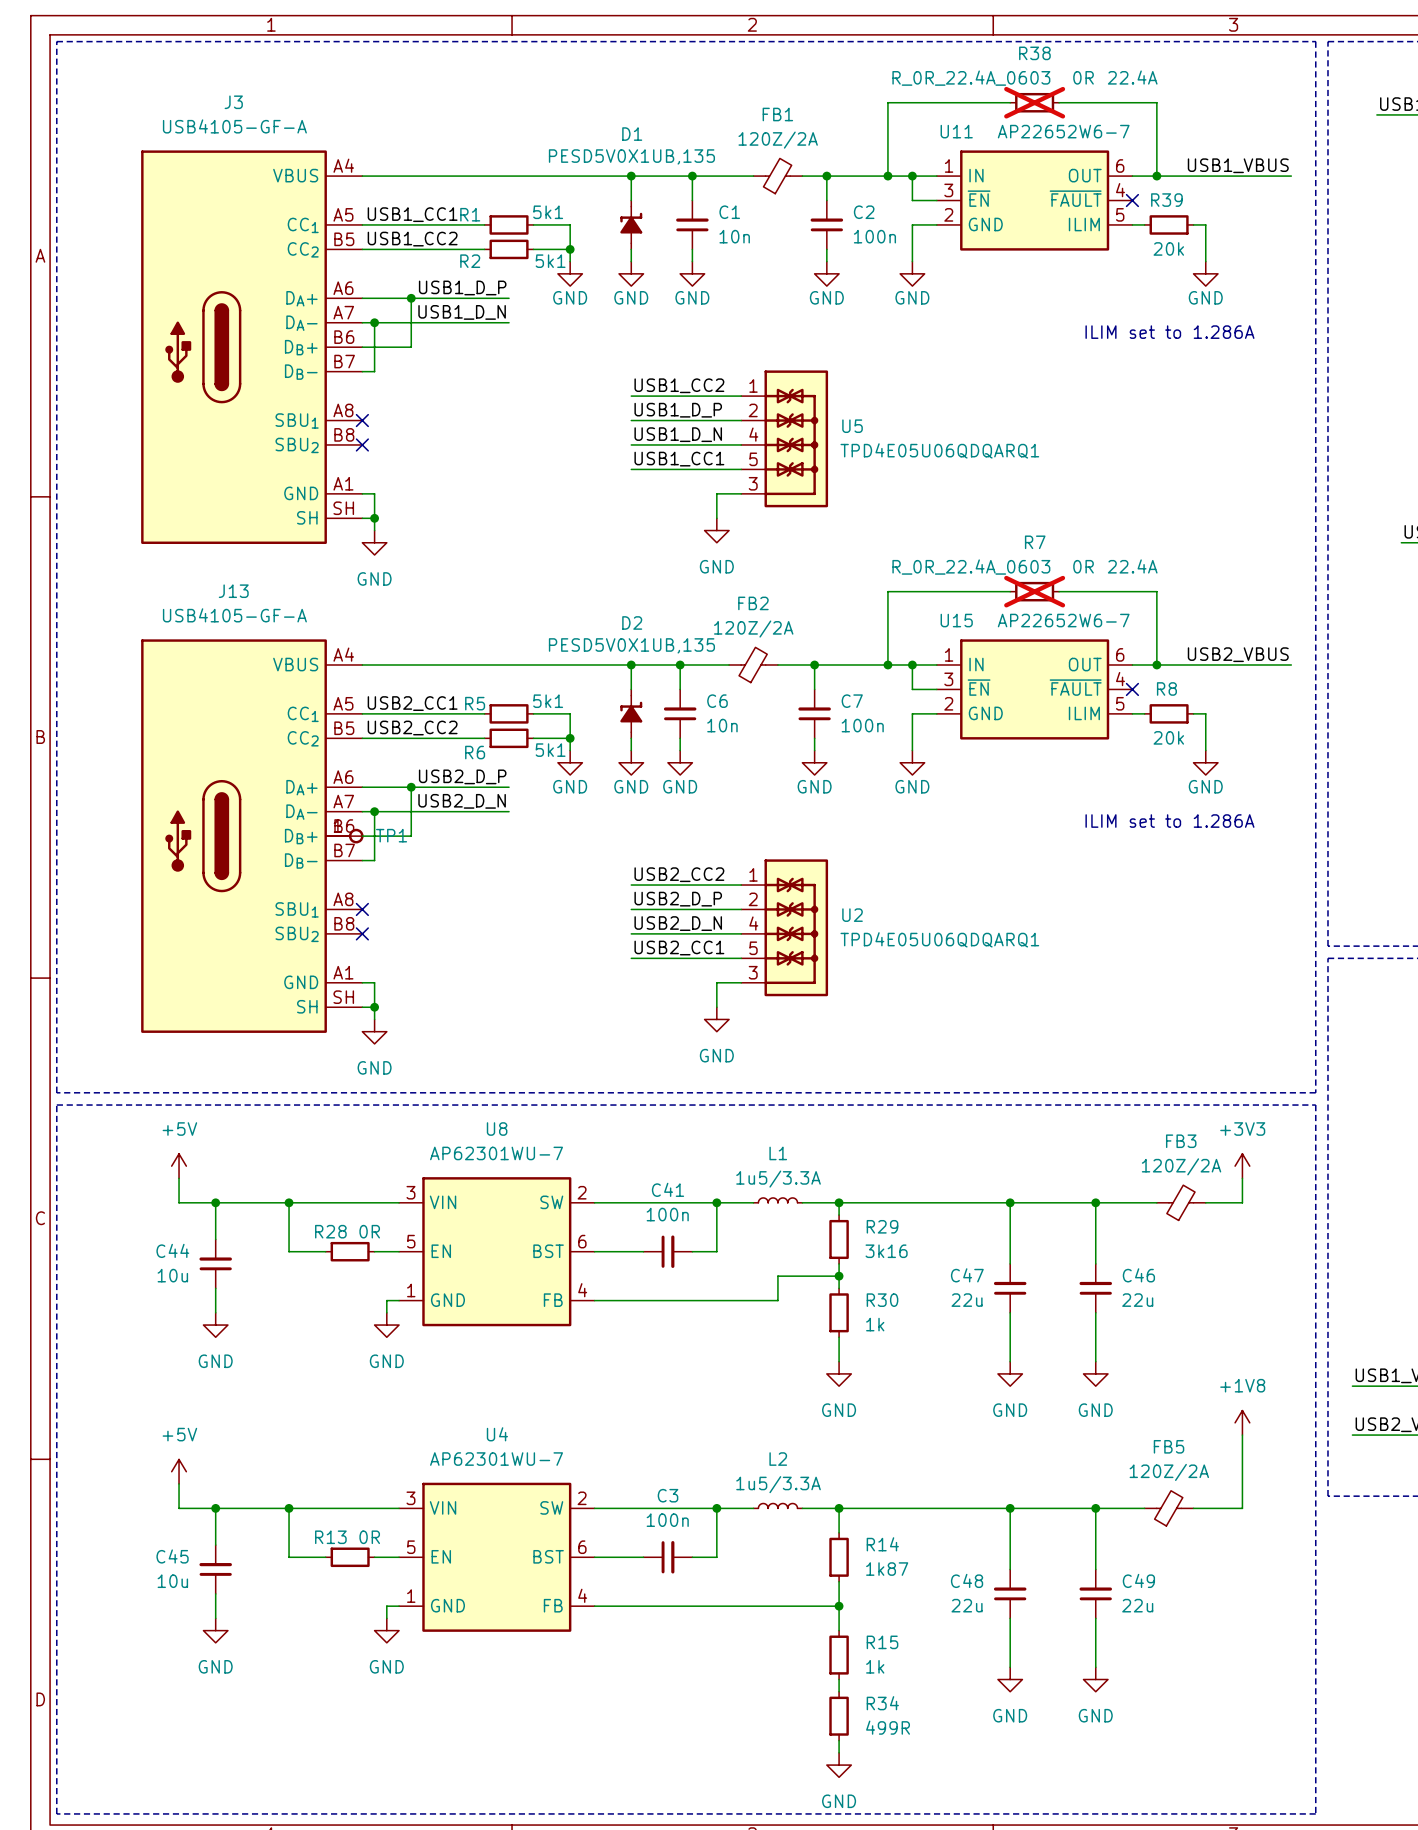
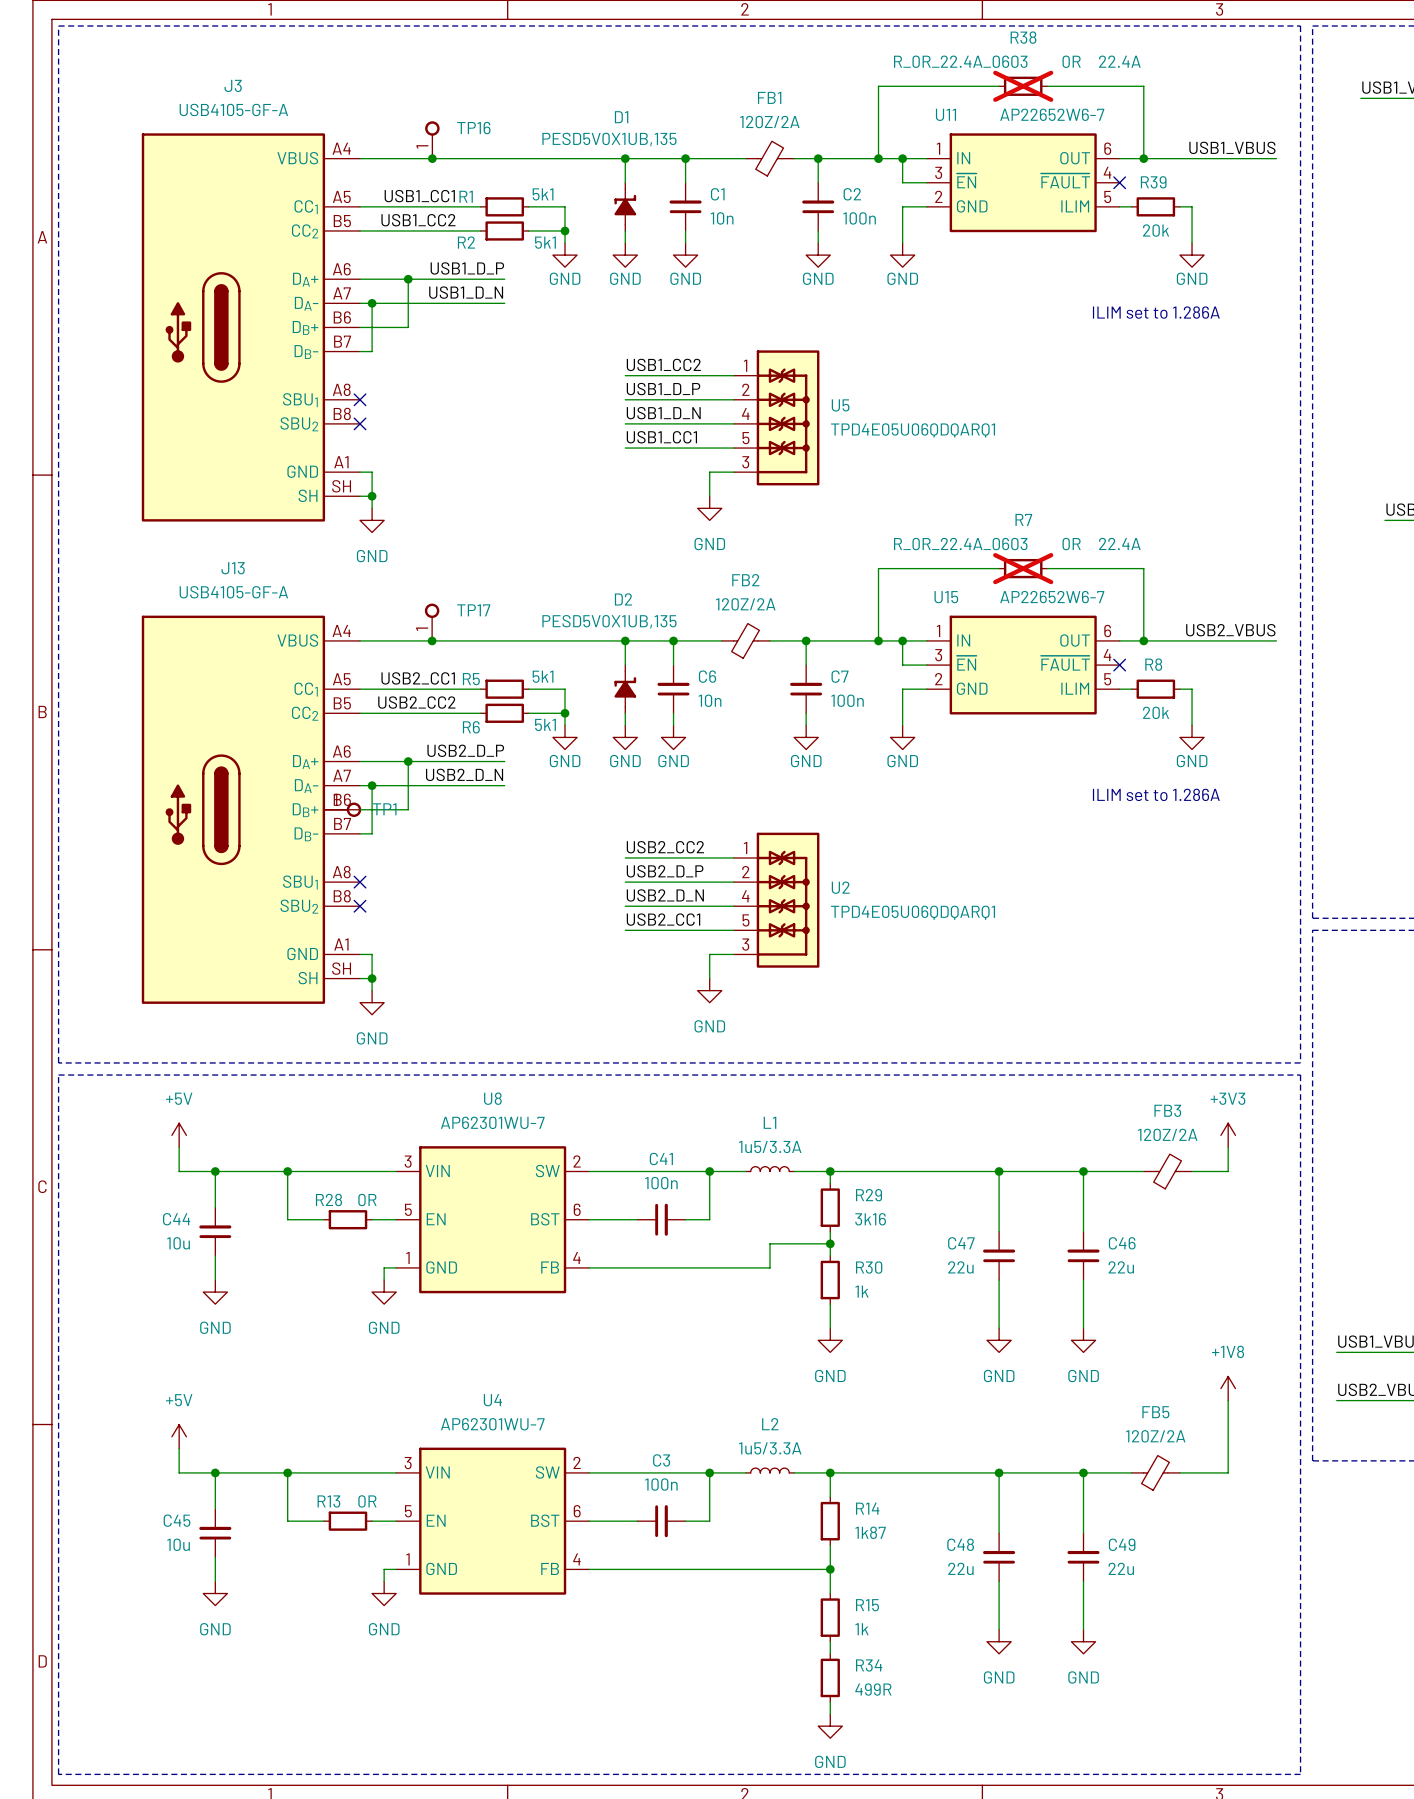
TP16: none -> (432, 139)
junction: none -> (432, 158)
TP17: none -> (432, 622)
junction: none -> (432, 640)

